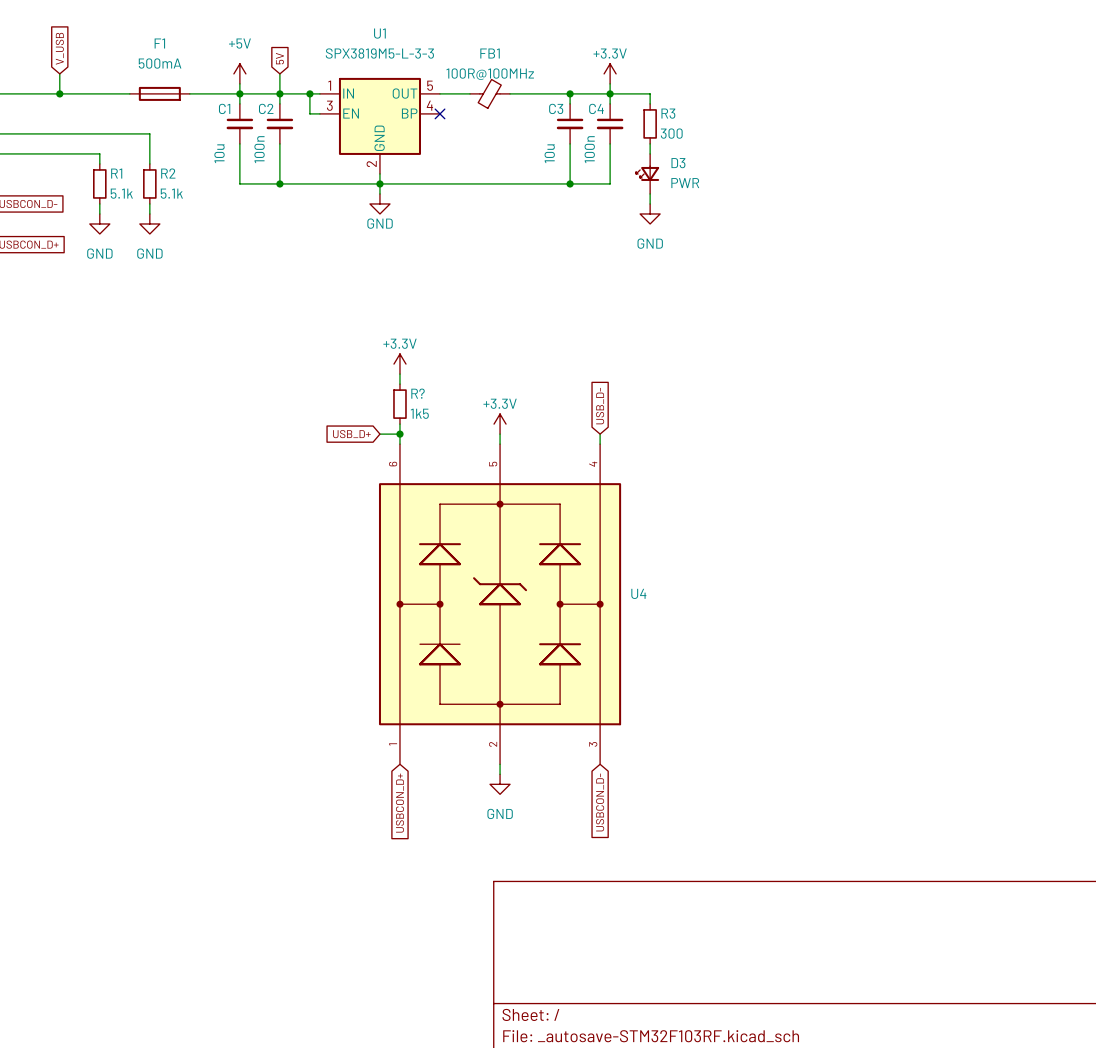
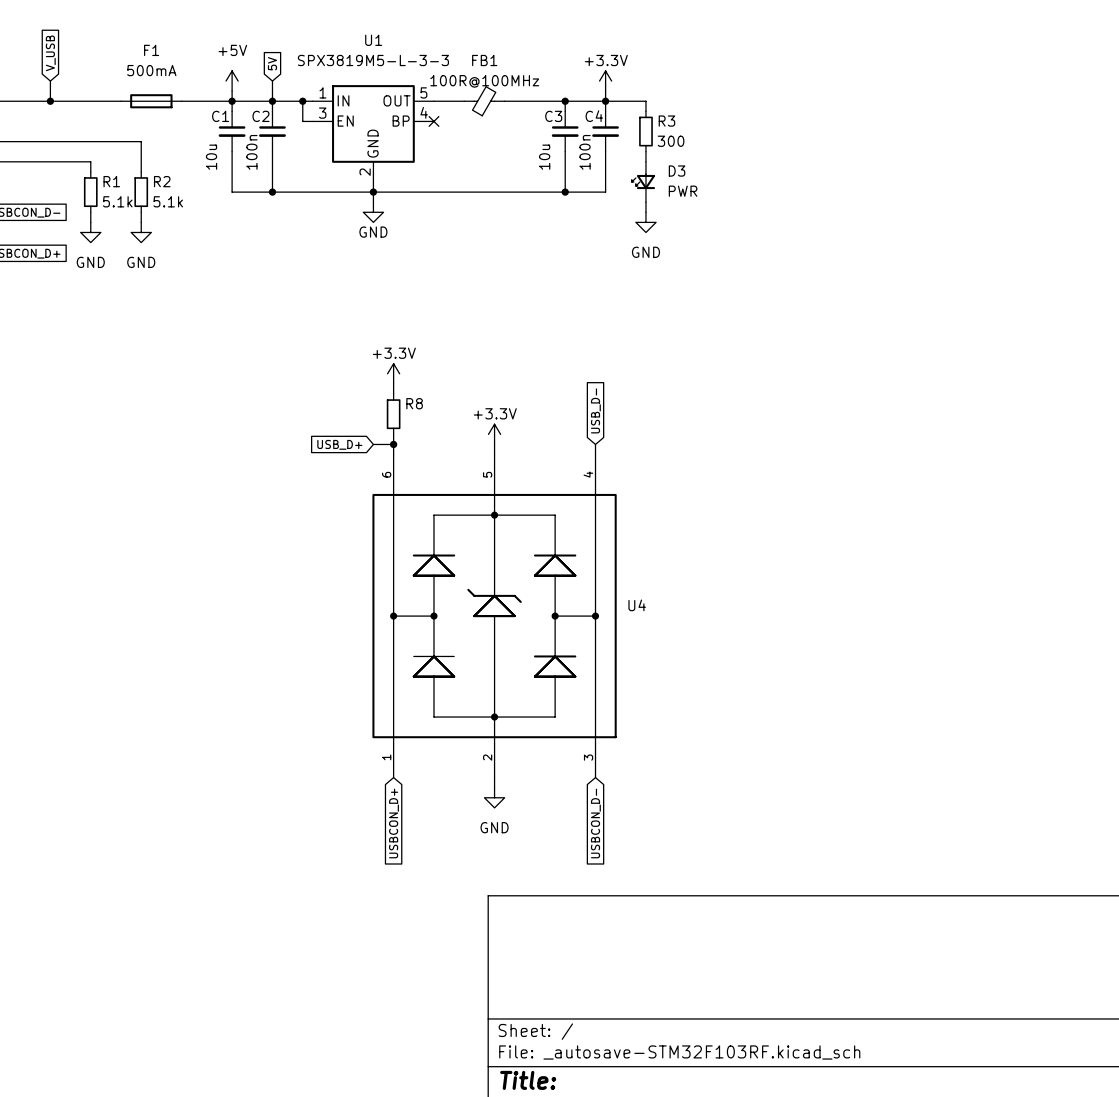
R? name: R? (418, 393) -> R8 (414, 403)
R? value: 1k5 (419, 413) -> none

